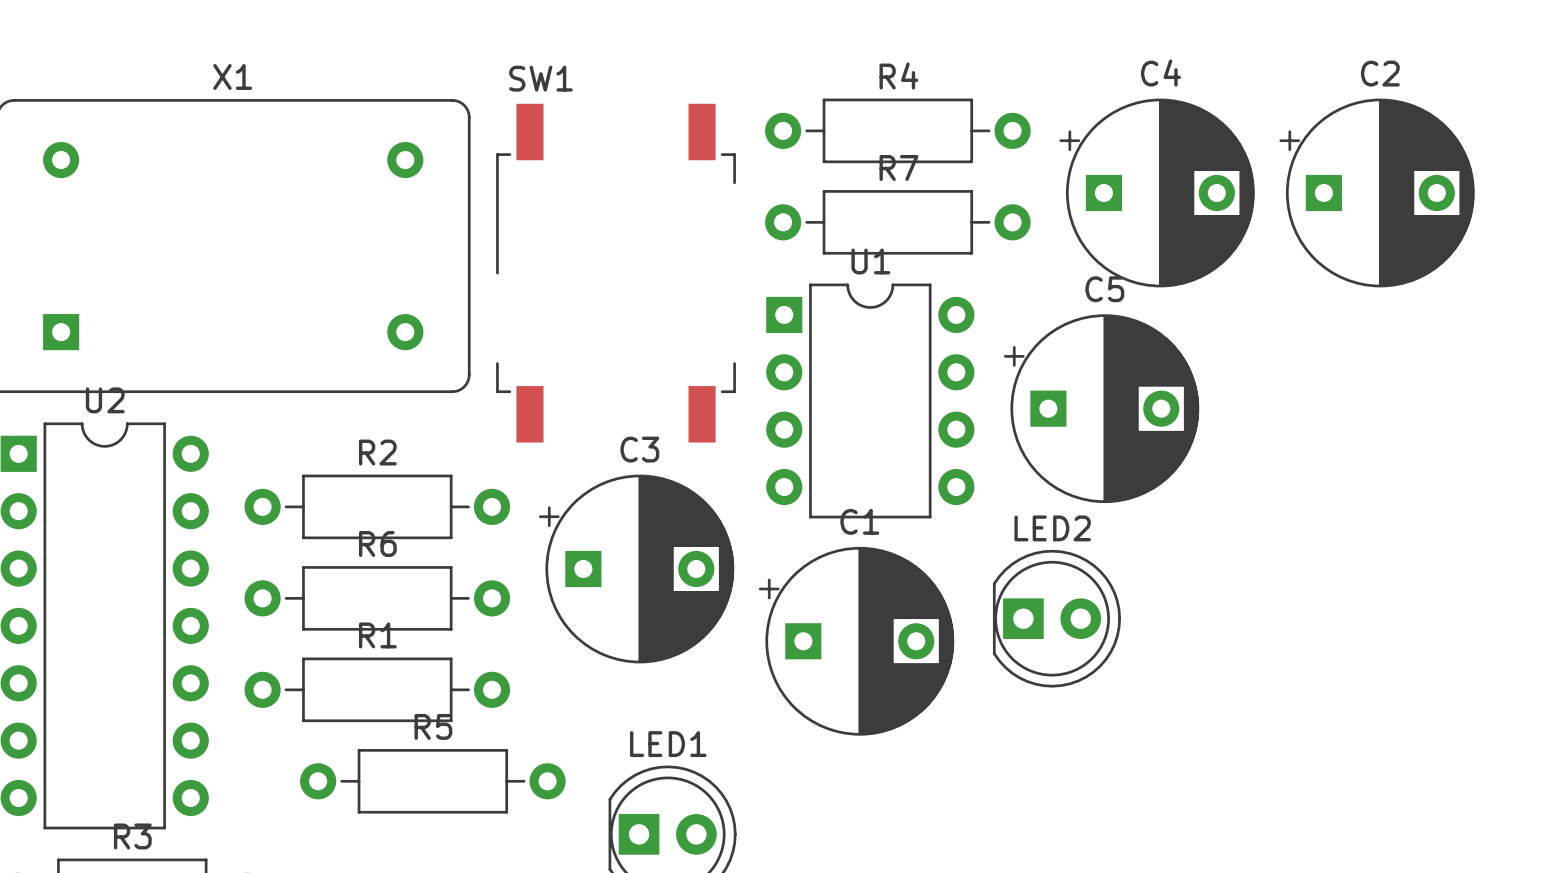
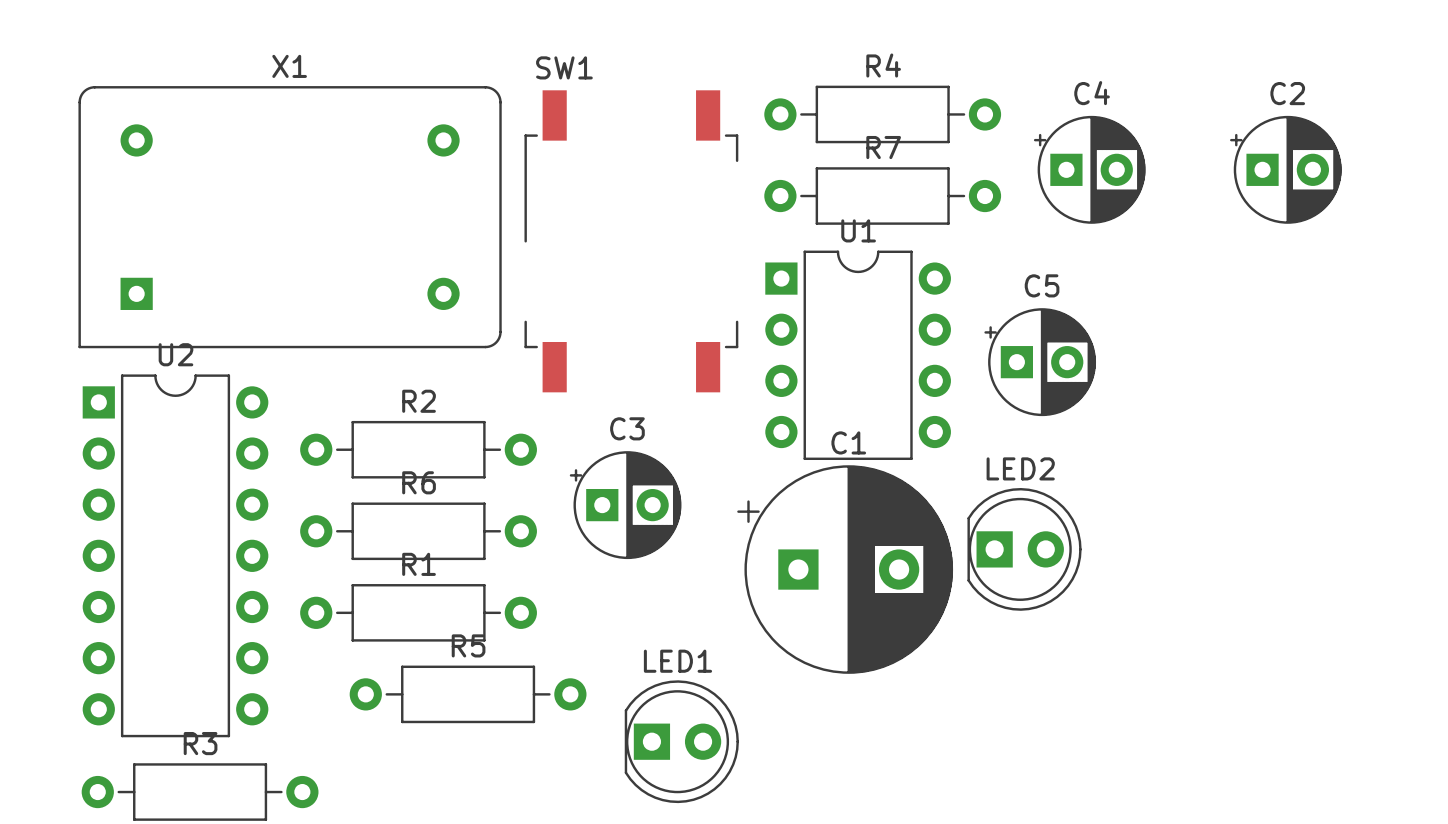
C4 footprint: [1059, 98, 1255, 288] -> [1033, 115, 1146, 224]
C2 footprint: [1279, 98, 1475, 288] -> [1230, 115, 1342, 224]
C5 footprint: [1003, 314, 1200, 504] -> [984, 308, 1097, 417]
C3 footprint: [538, 474, 735, 664] -> [569, 451, 682, 560]
C1 footprint: [758, 546, 955, 736] -> [737, 465, 954, 674]

